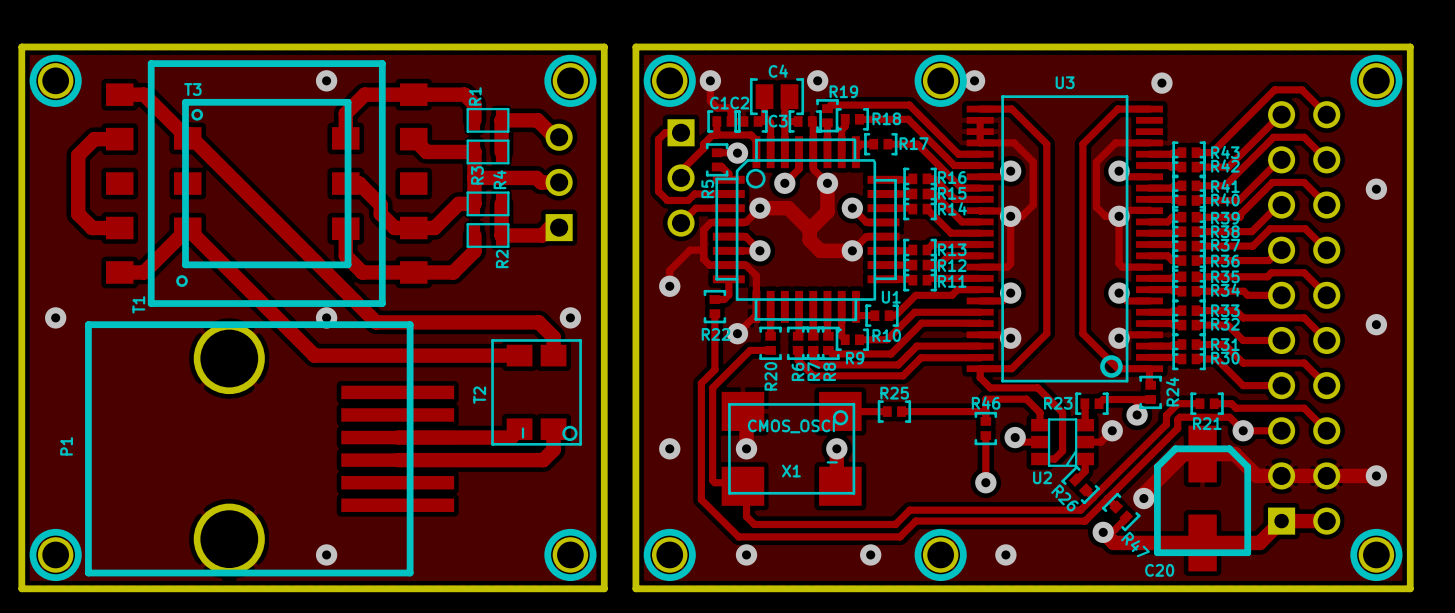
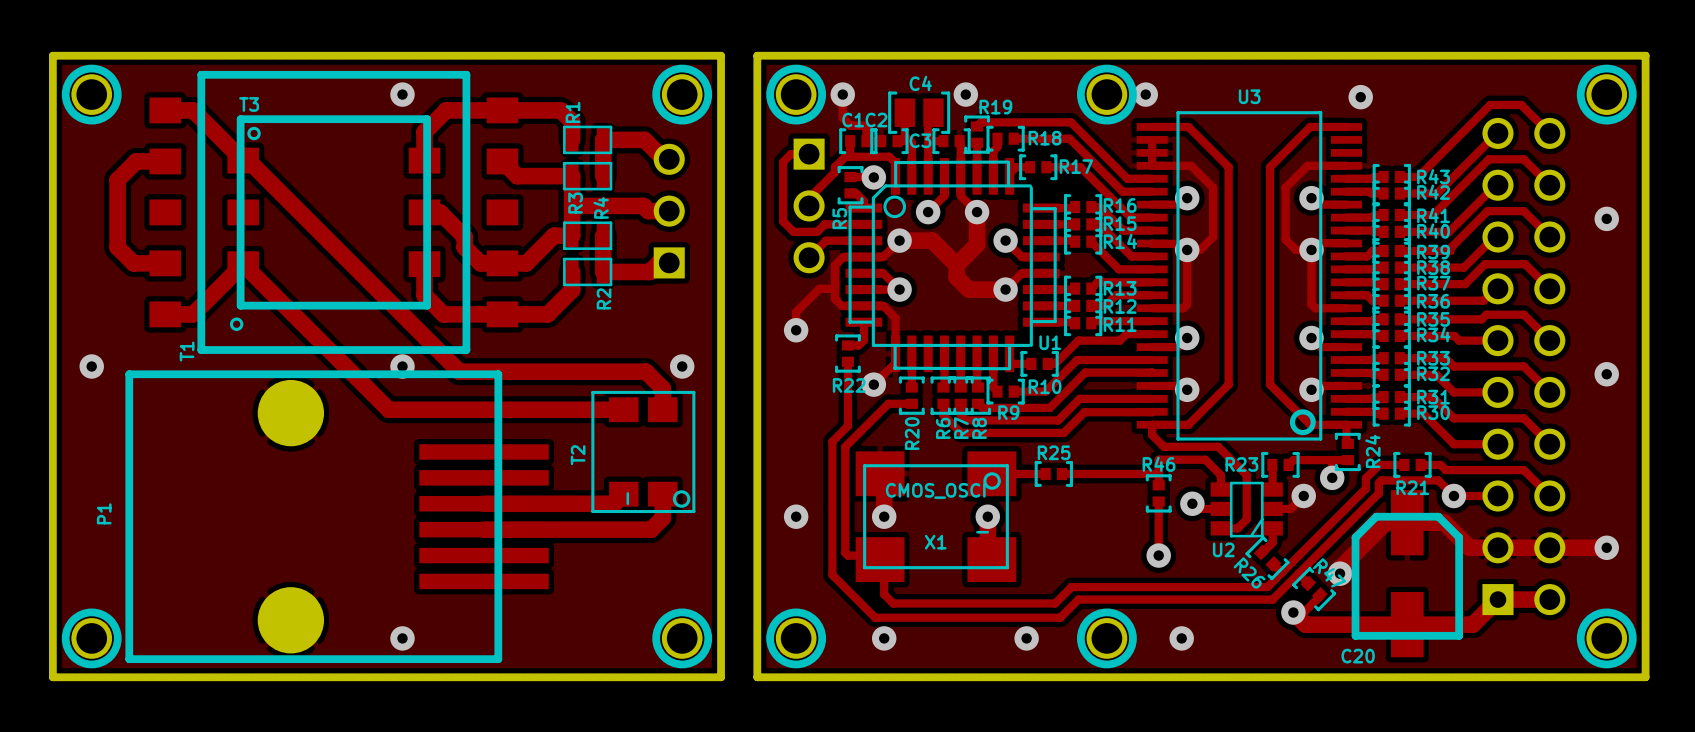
P1 footprint: [85, 321, 455, 577] -> [125, 370, 549, 664]
R47 name position: R47 (1135, 544) -> R47 (1329, 572)

